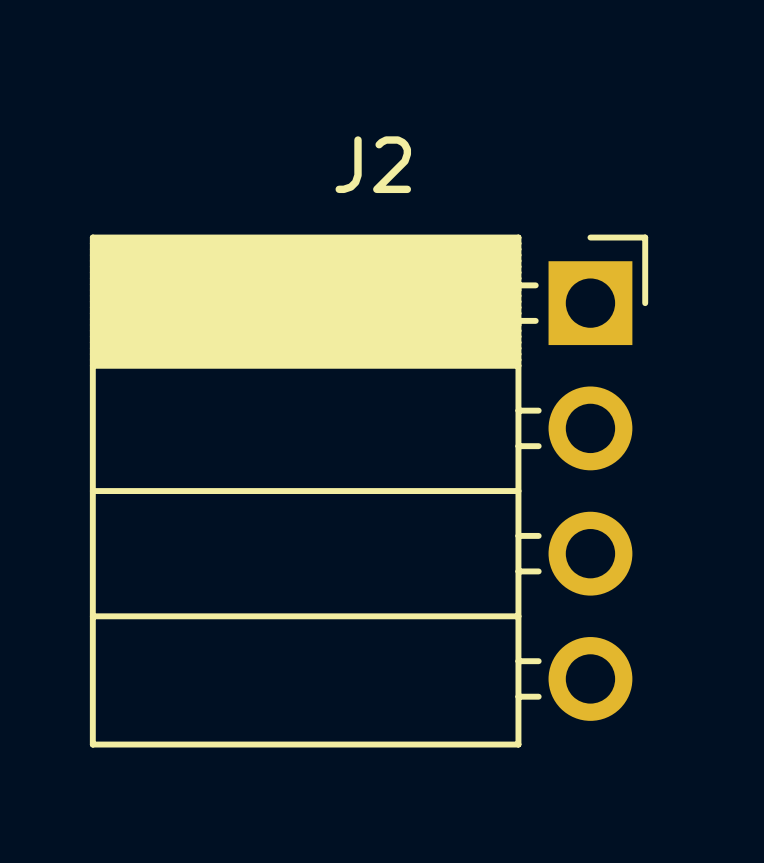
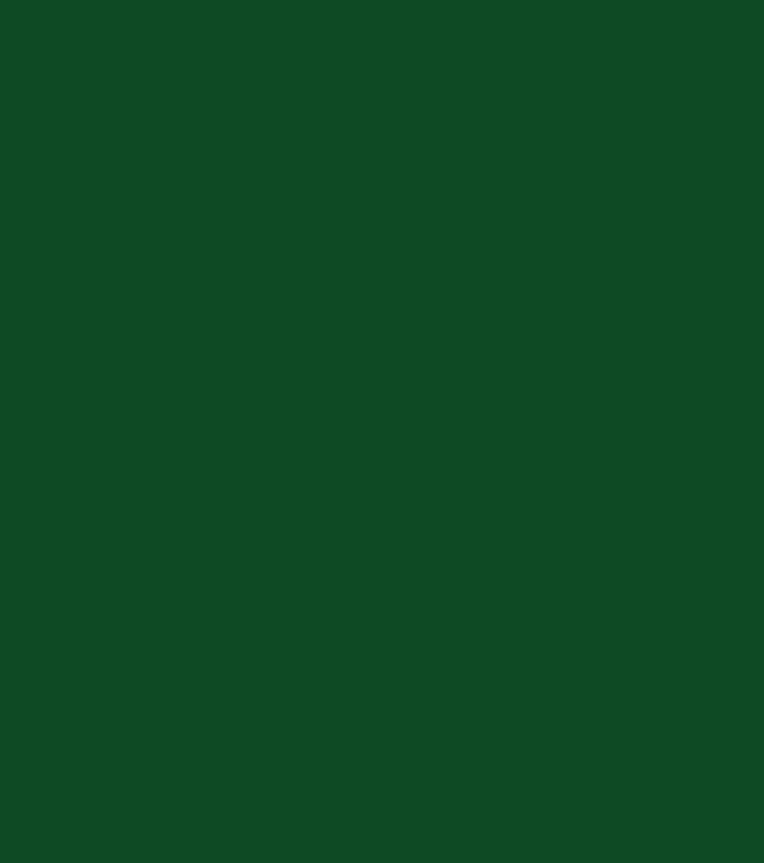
J2: (369, 491) -> none

